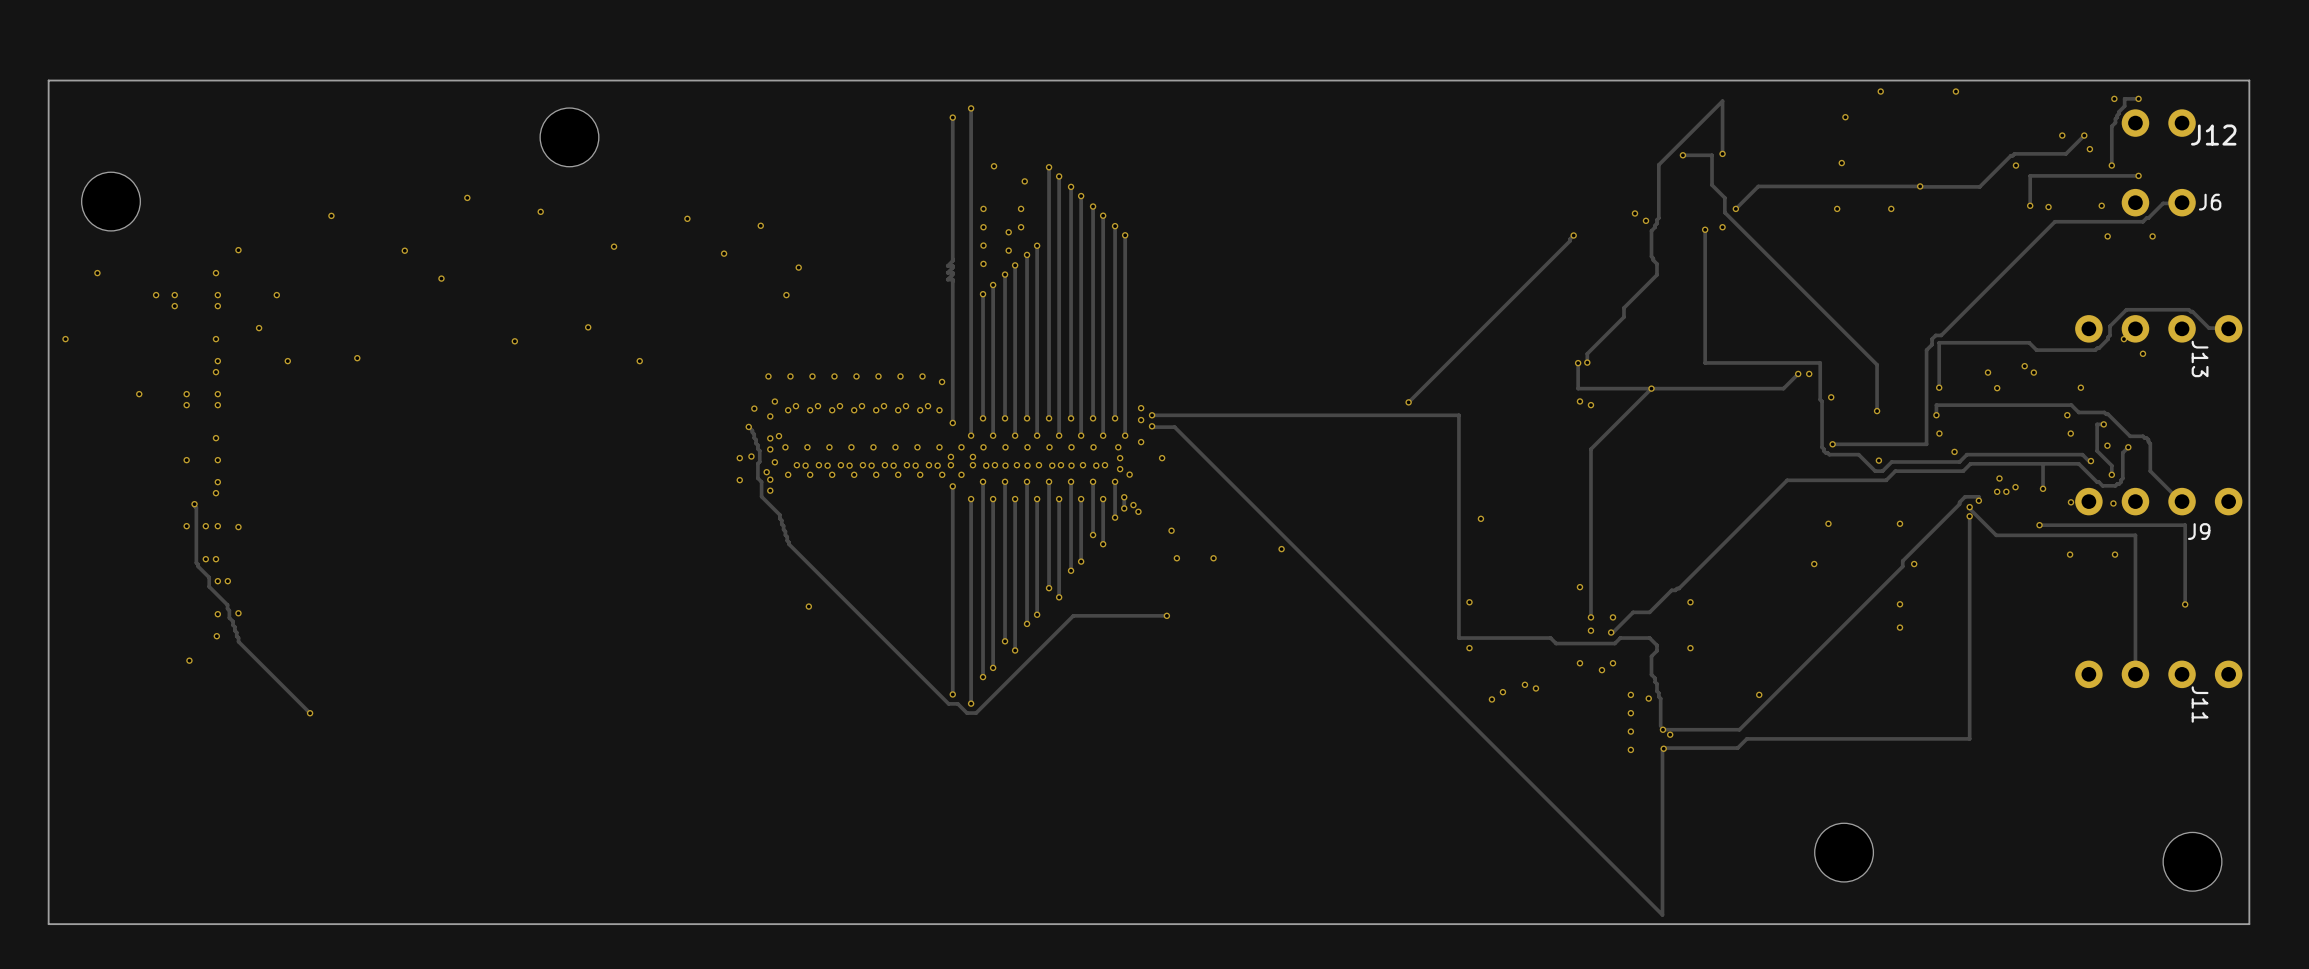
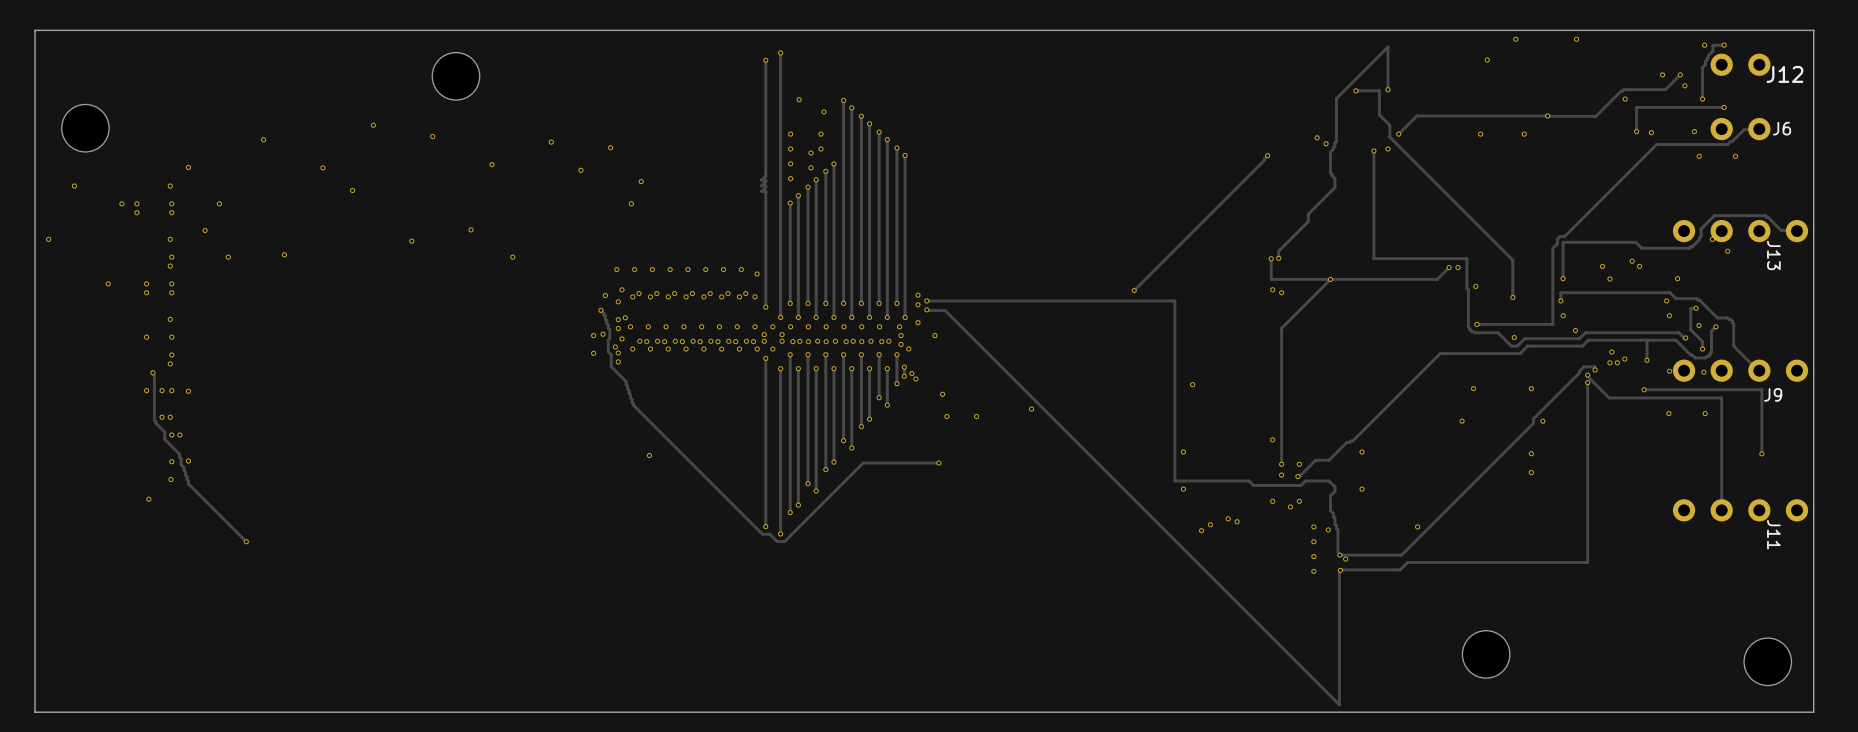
via: (1841, 163) -> none

